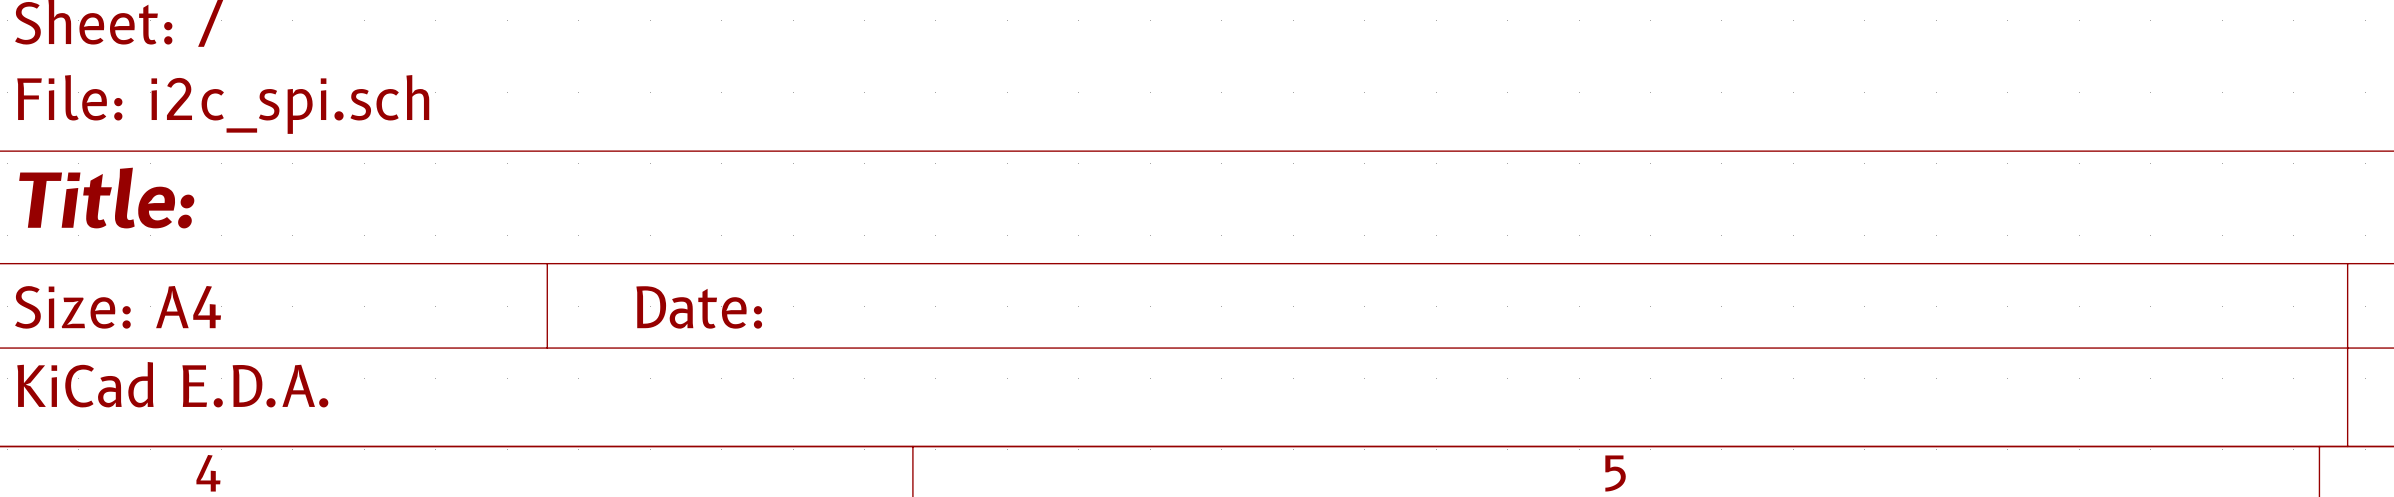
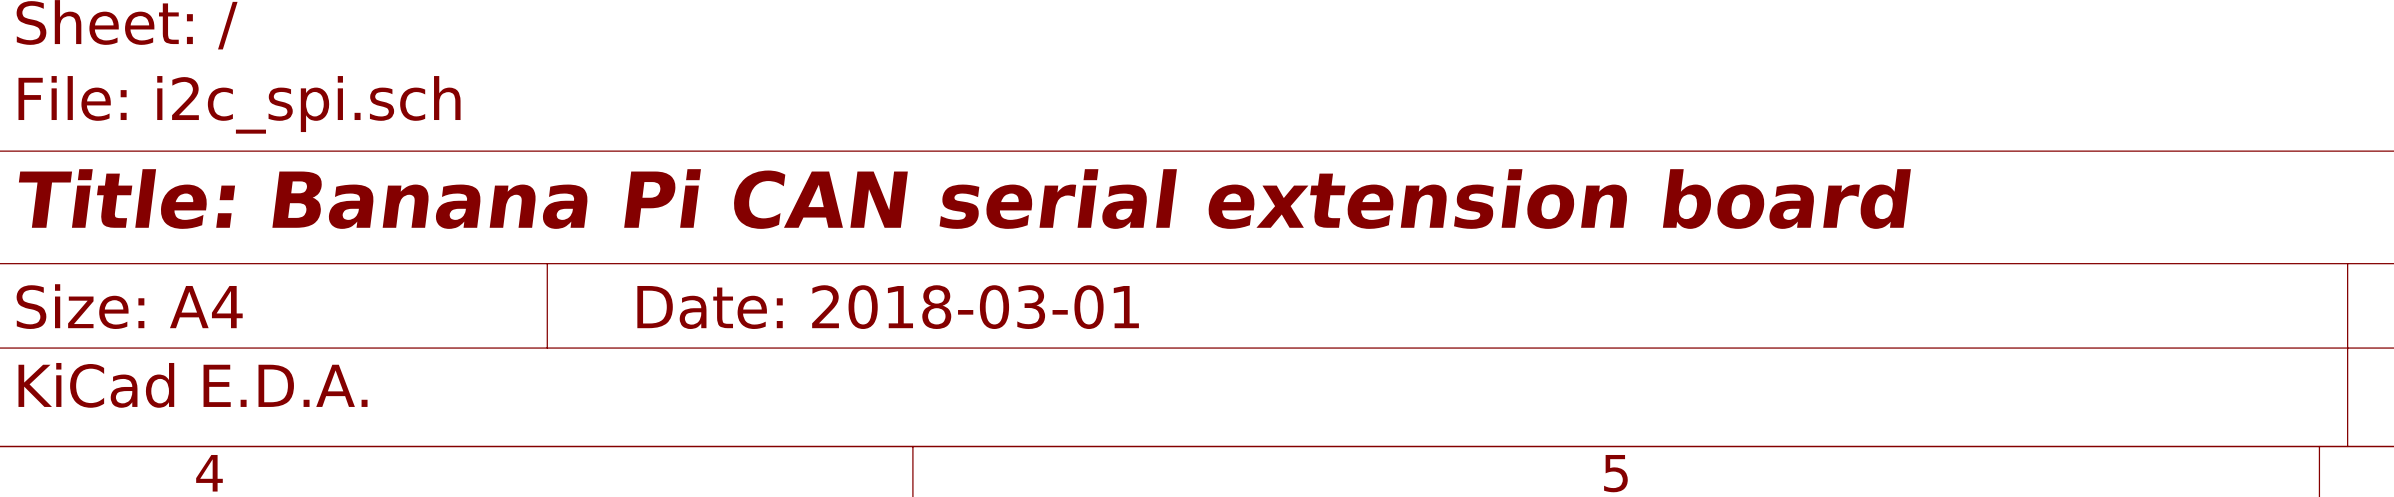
title block: Title: (106, 198) -> Title: Banana Pi CAN serial extension board (964, 199)
title block: Date: (699, 307) -> Date: 2018-03-01 (888, 307)

